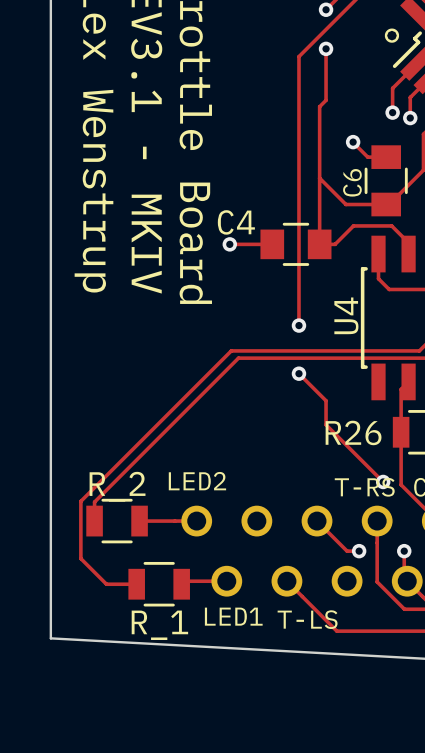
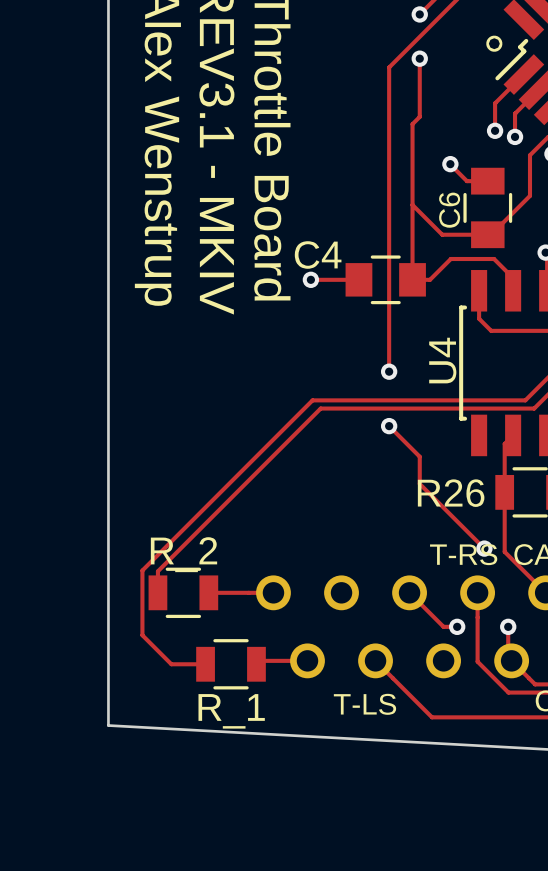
text: LED2 (197, 481) -> none
text: LED1 (233, 616) -> none
text position: T-LS (307, 619) -> T-LS (364, 704)

